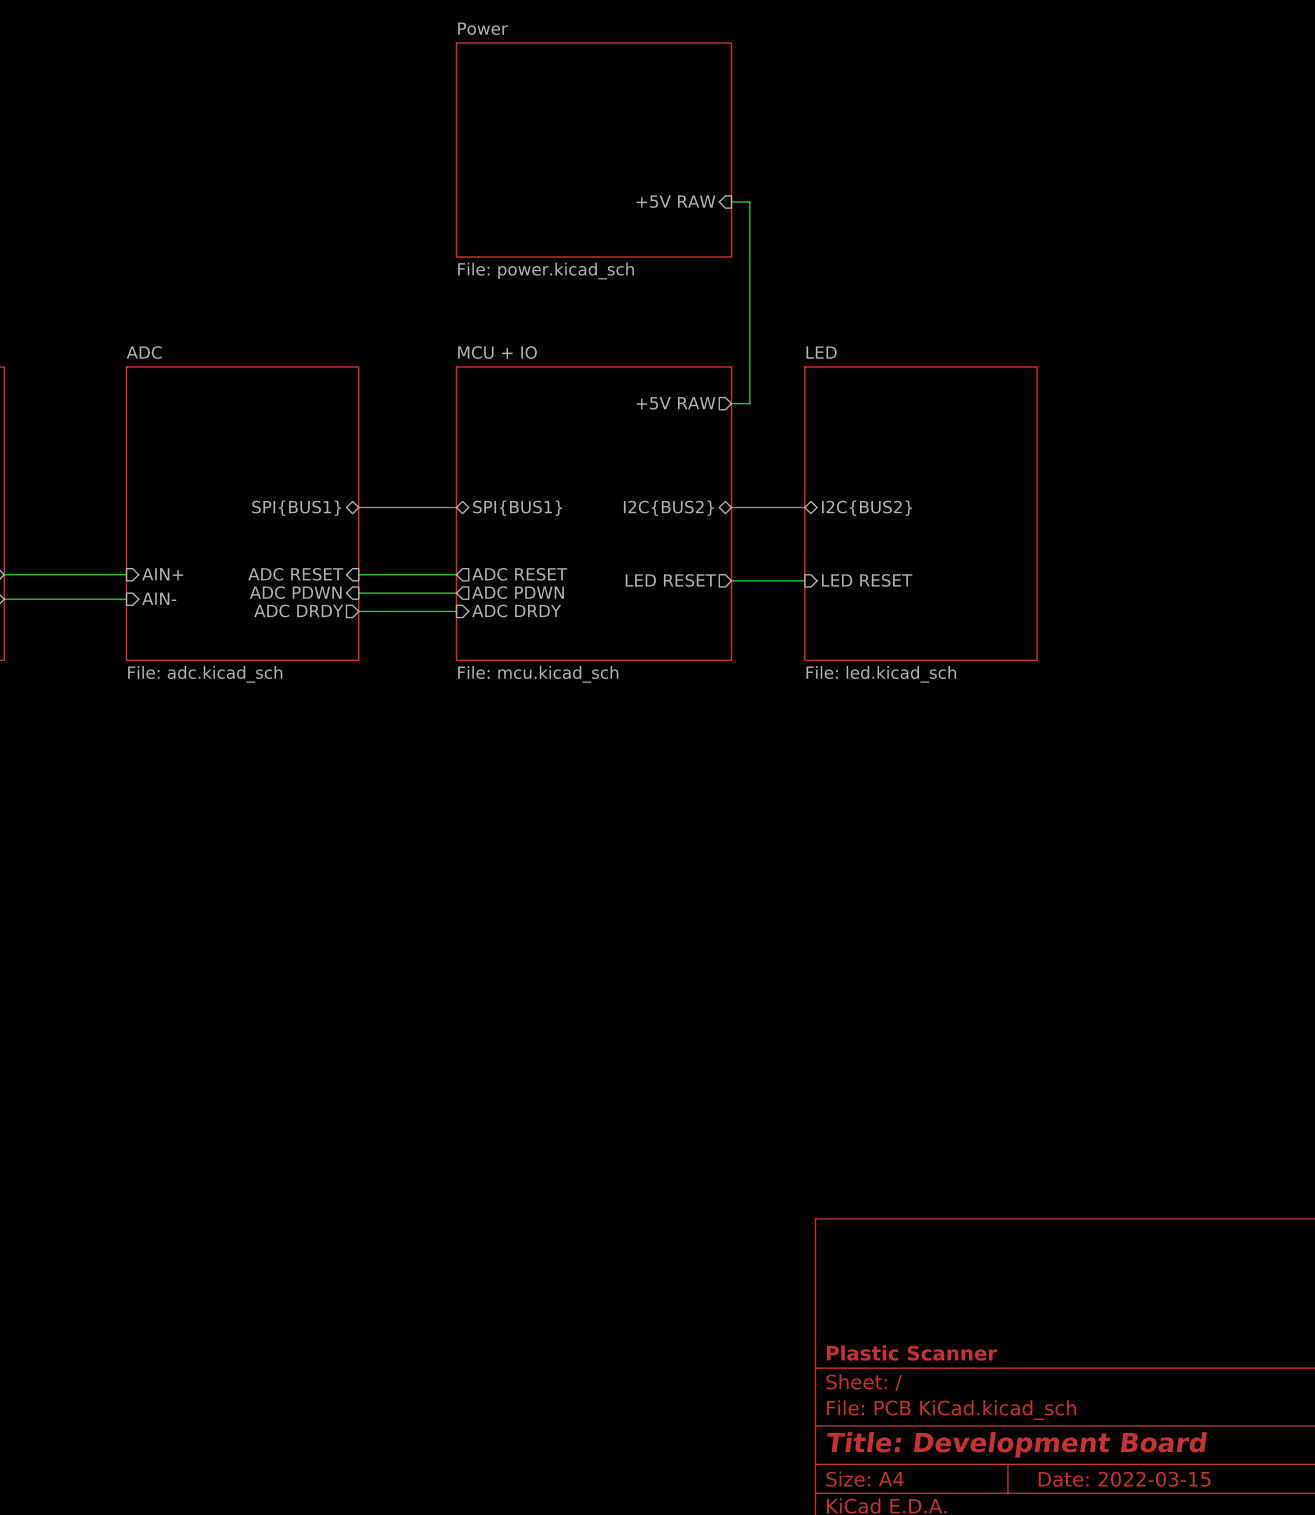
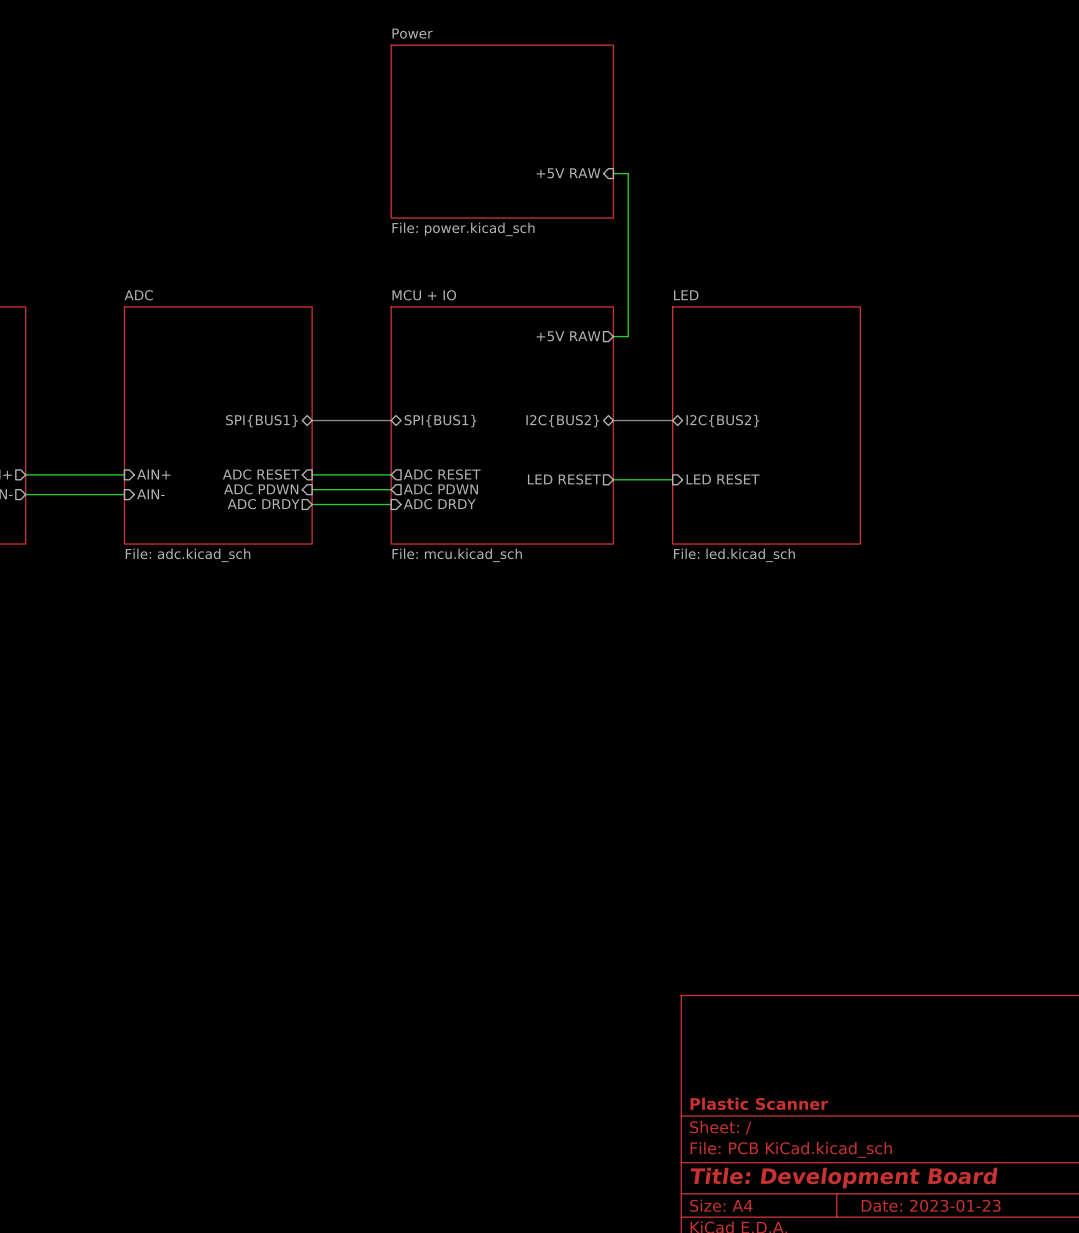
title block: Date: 2022-03-15 (1124, 1479) -> Date: 2023-01-23 (931, 1205)

